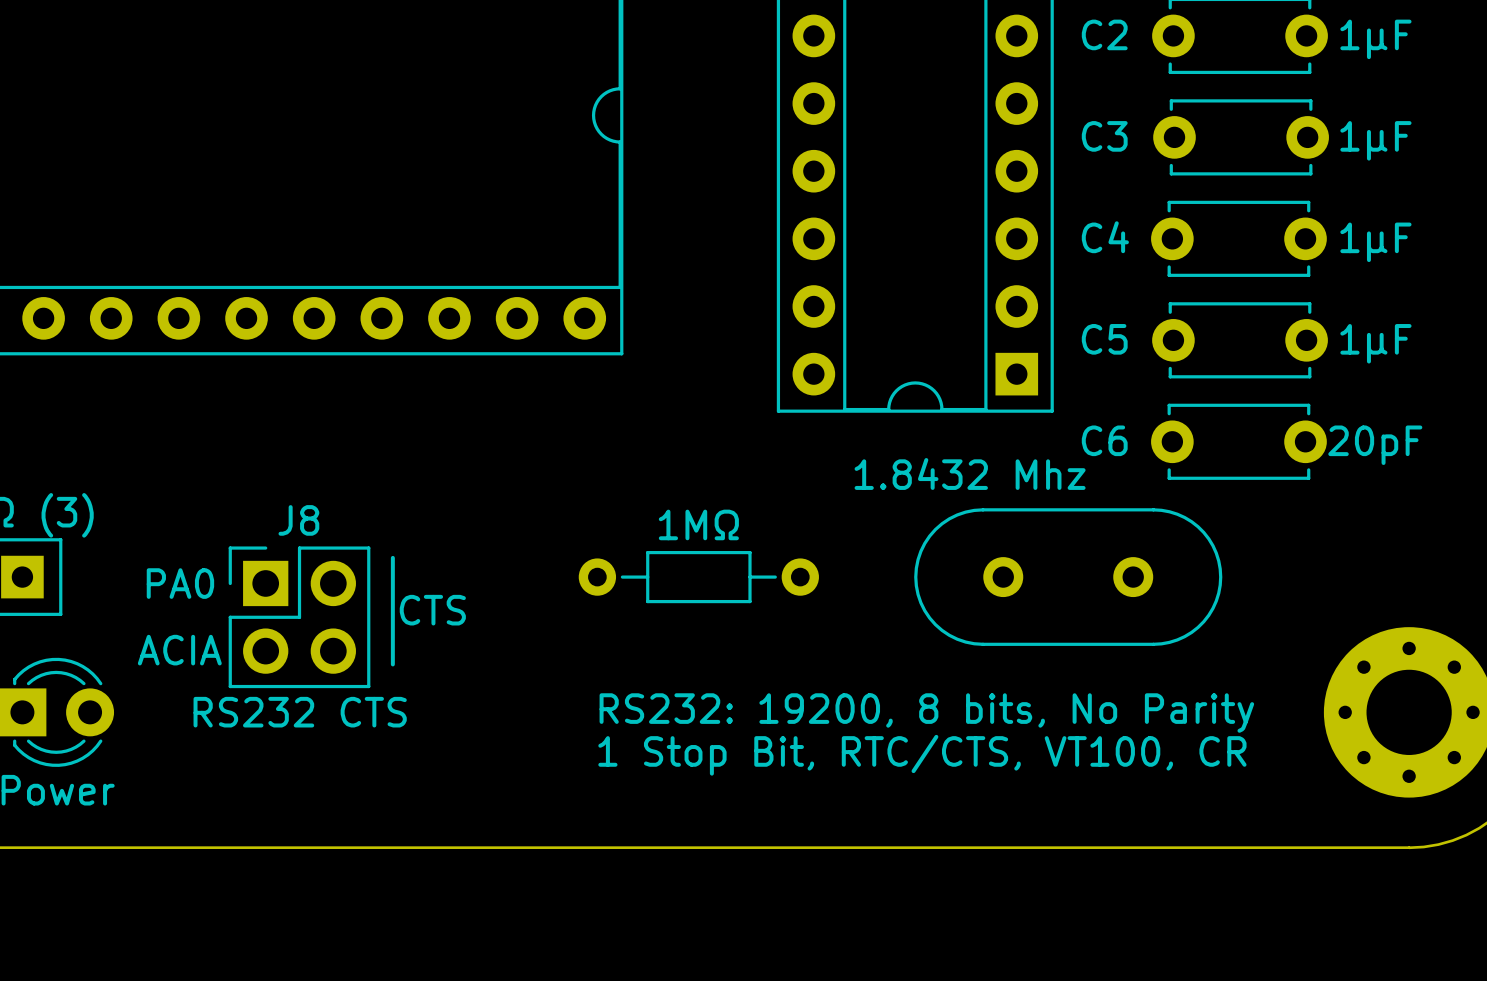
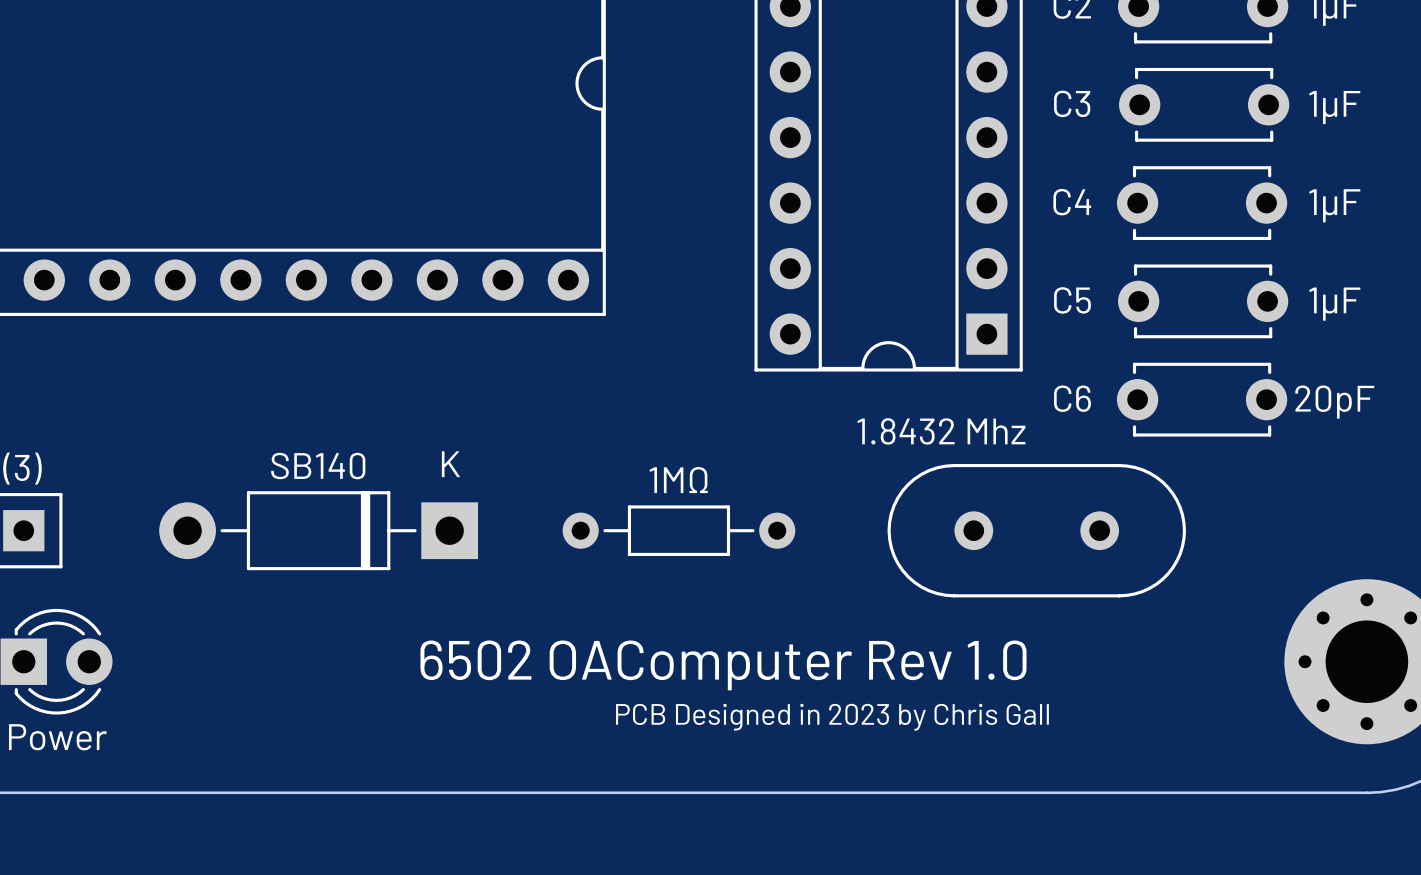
line: (392, 557) (392, 664) -> none
part: none -> SB140 (318, 530)
text: PA0 (180, 583) -> none
text: CTS (432, 610) -> none
J8: RS232 CTS (299, 617) -> none
text: ACIA (179, 650) -> none
text: RS232: 19200, 8 bits, No Parity (926, 713) -> none
text: none -> 6502 OAComputer Rev 1.0 (723, 665)
text: 1 Stop Bit, RTC/CTS, VT100, CR (922, 755) -> none
text: none -> PCB Designed in 2023 by Chris Gall (832, 717)

